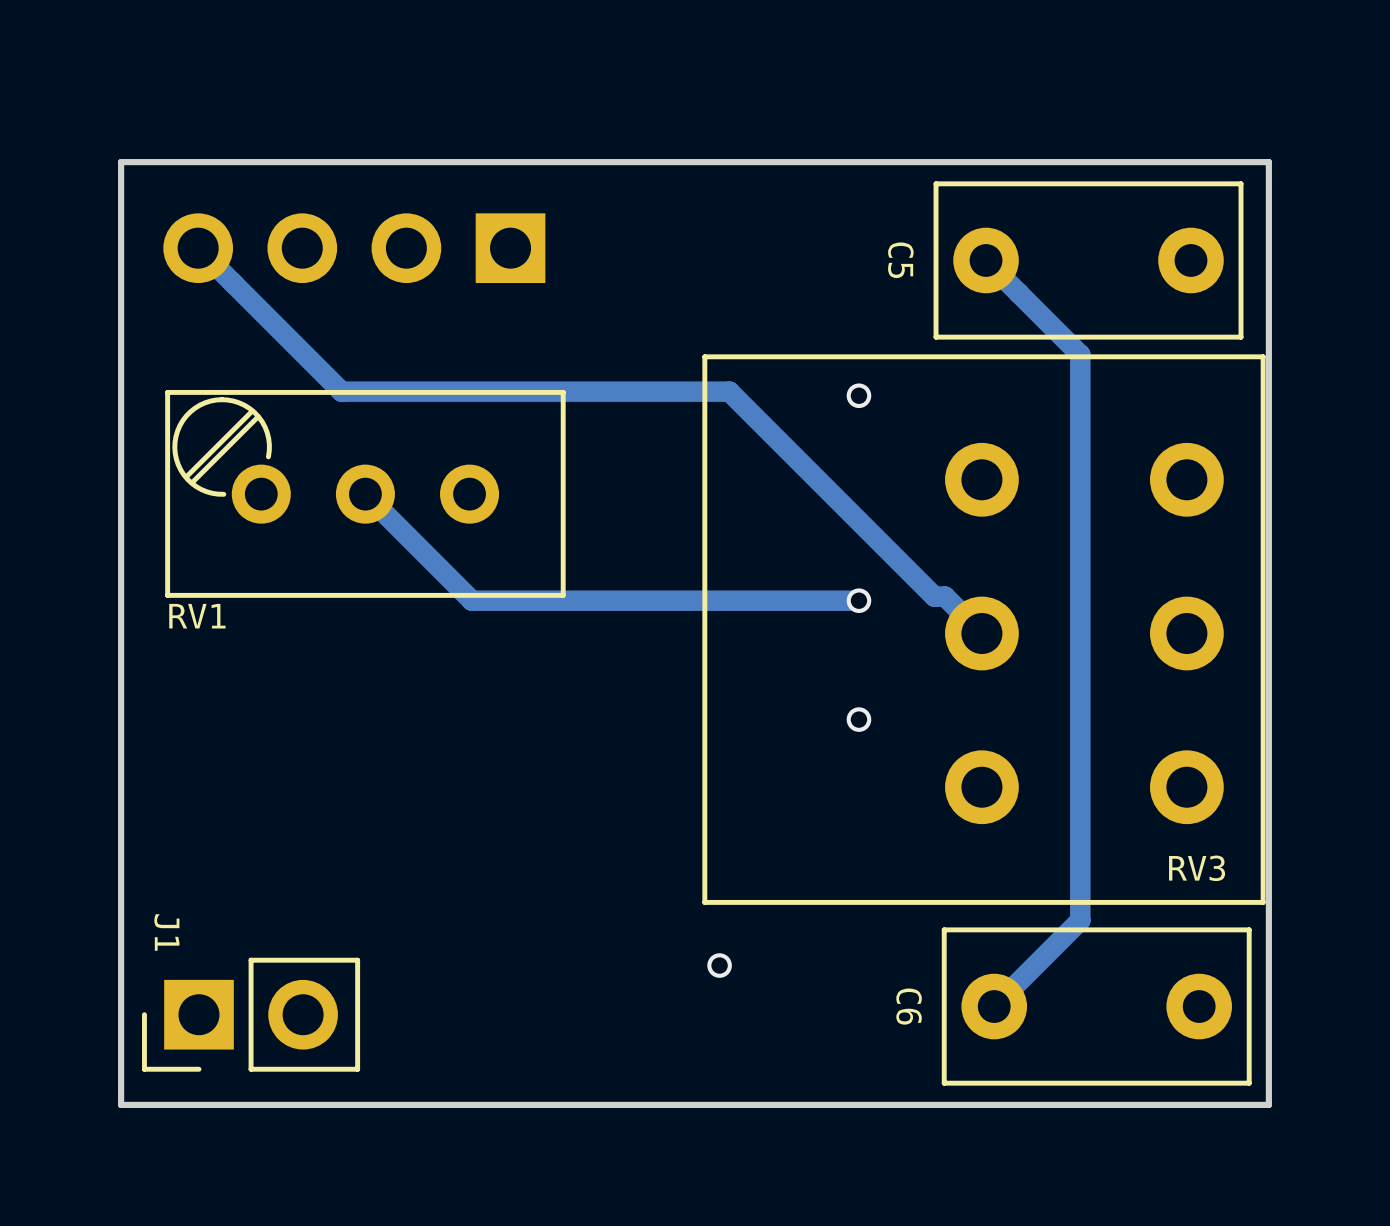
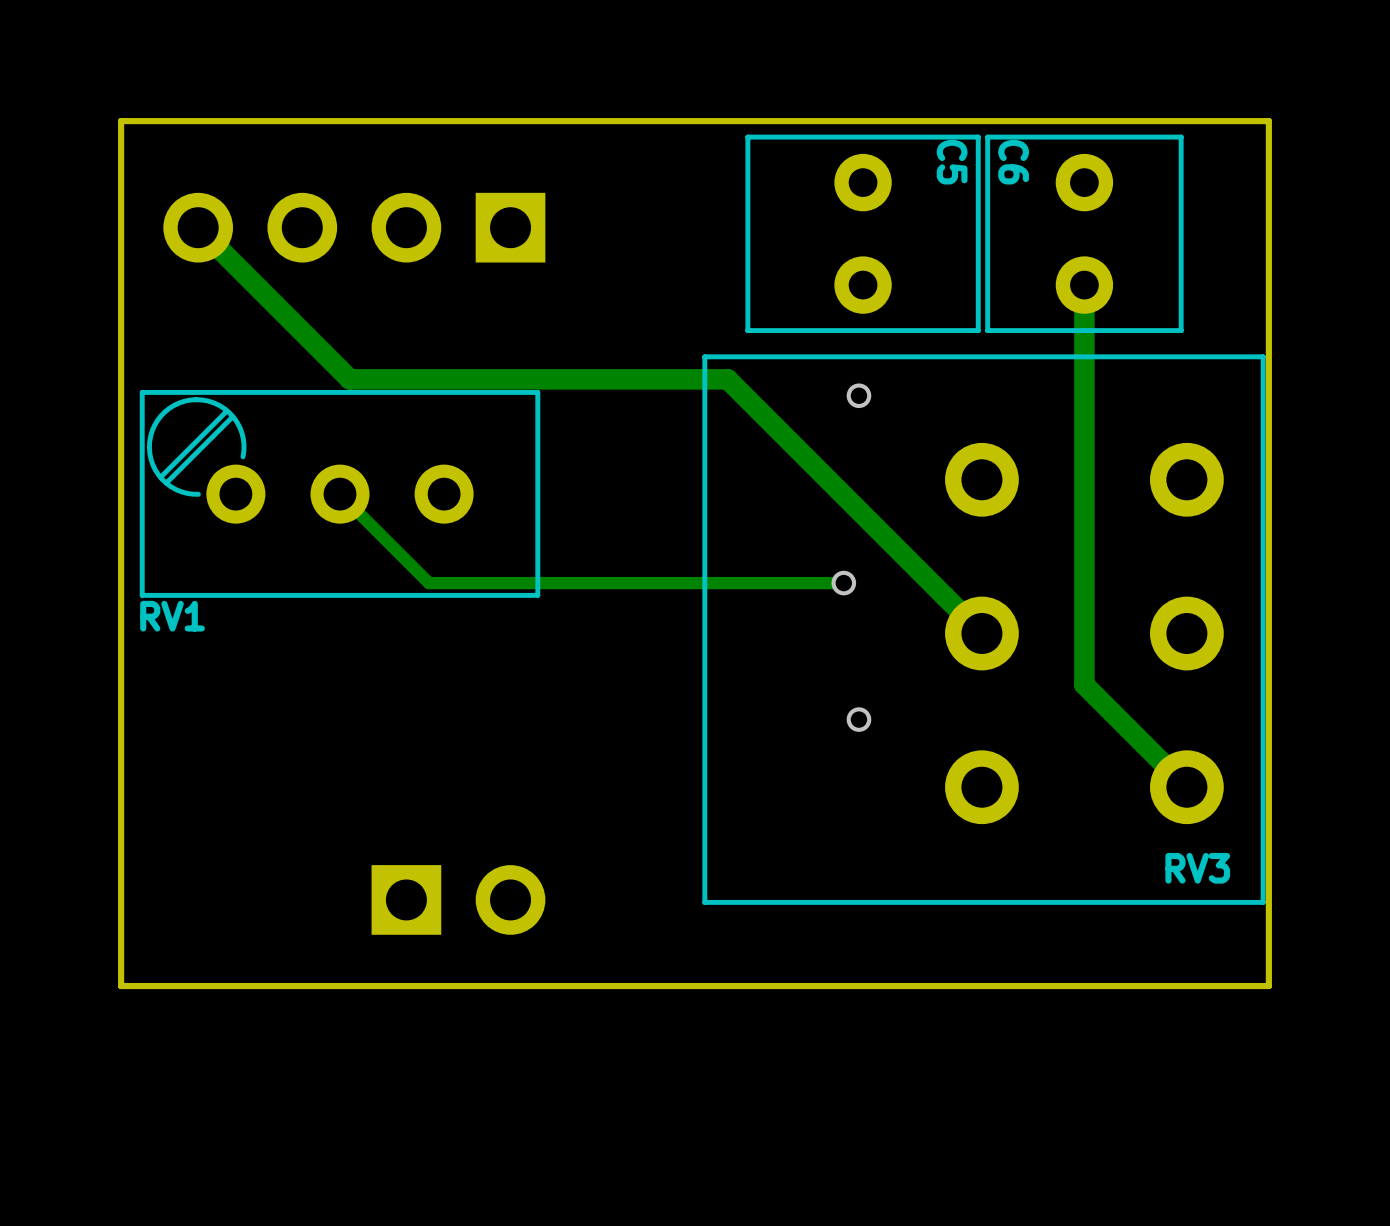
board edge: (1268, 162) (121, 162) -> (1268, 162) (1268, 121) (121, 121) (121, 162)
C5 footprint: [933, 181, 1244, 340] -> [745, 134, 981, 334]
track: (198, 248) (341, 391) (729, 391) (934, 596) (945, 596) -> (198, 227) (349, 379) (727, 379) (945, 596)
part position: (354, 248) -> (354, 227)
C5 name position: C5 (900, 260) -> C5 (952, 162)
track: (986, 260) (1080, 354) (1080, 920) (994, 1006) -> none
track: none -> (1084, 285) (1084, 684) (1186, 787)
RV1 position: (365, 493) -> (340, 493)
track: none -> (340, 494) (428, 583) (843, 583)
track: (365, 494) (472, 600) (858, 600) -> none
via position: (858, 600) -> (843, 583)
C6 footprint: [941, 927, 1252, 1086] -> [985, 134, 1184, 334]
via: (719, 965) -> none
board edge: (1268, 986) (1268, 1104) (121, 1104) (121, 986) -> (1268, 986) (121, 986)
C6 name position: C6 (909, 1006) -> C6 (1013, 162)
J1 side: bottom (251, 1014) -> top (458, 899)

